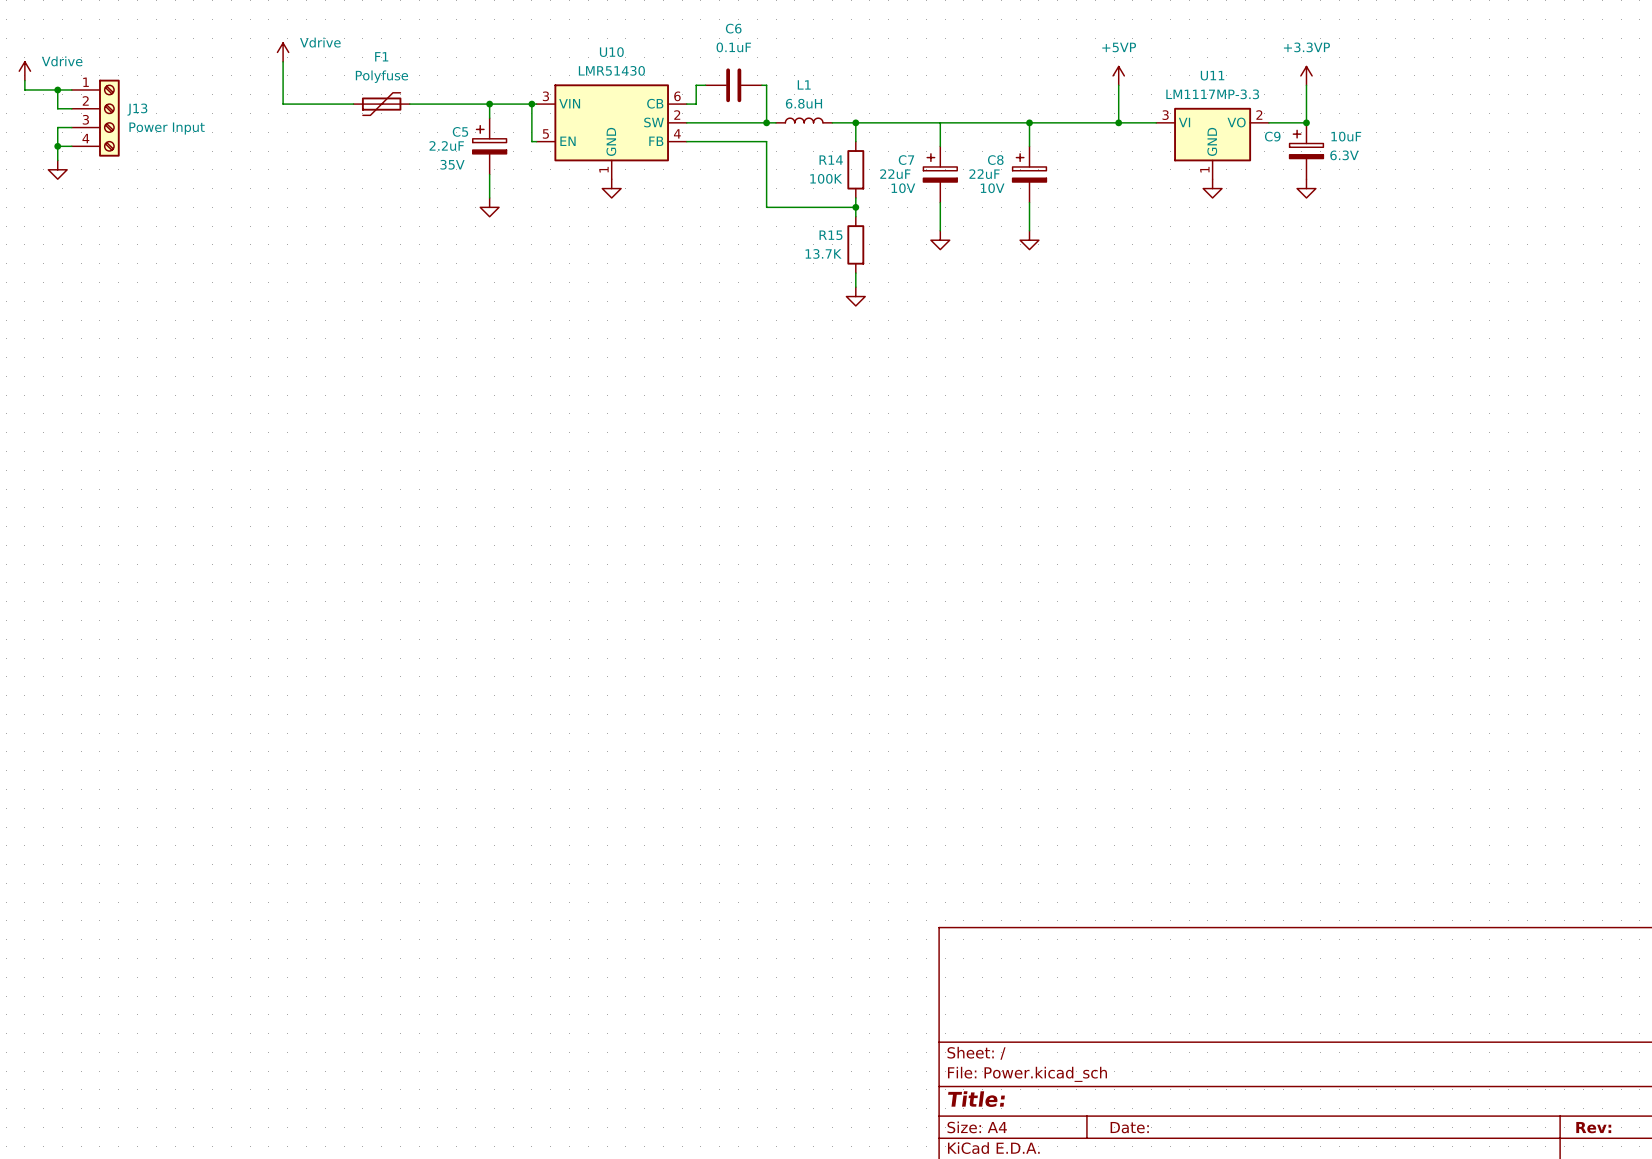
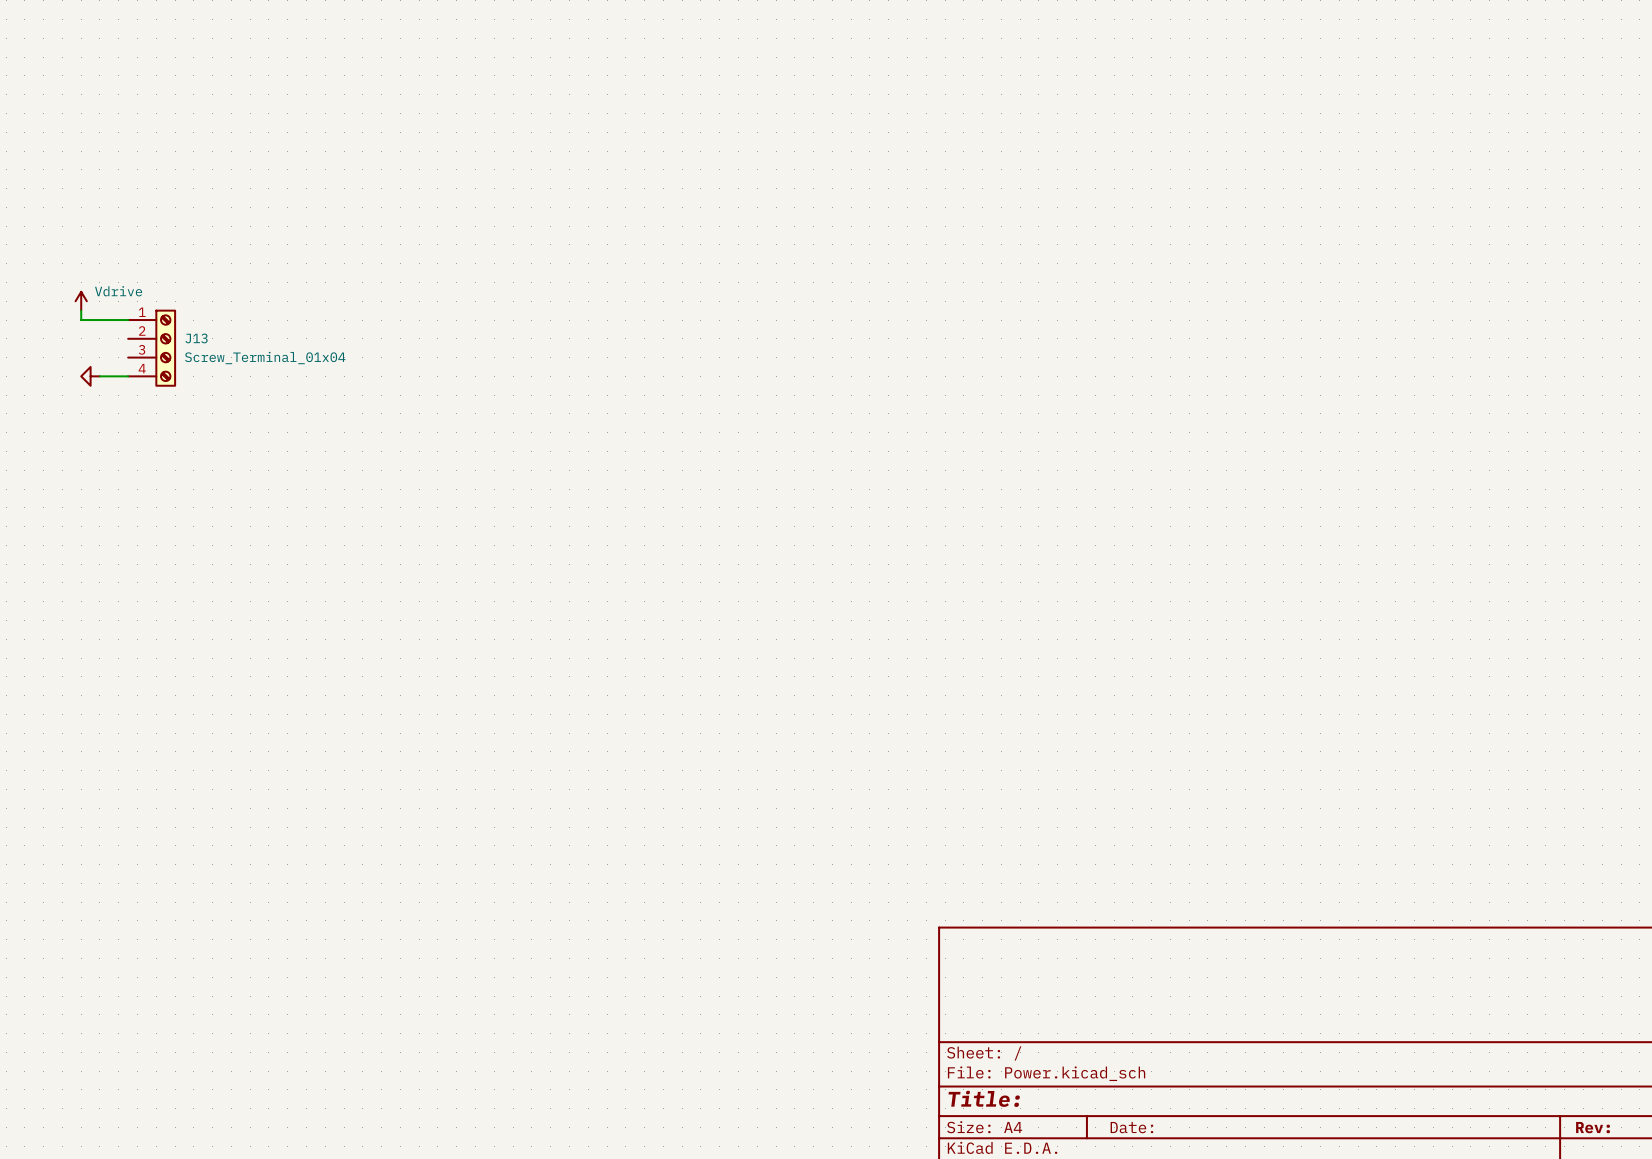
power symbol: Vdrive (283, 52) -> none
wire: (283, 61) (283, 104) (353, 104) -> none
power symbol: Vdrive (24, 71) -> none
power symbol: +5VP (1118, 75) -> none
power symbol: +3.3VP (1306, 75) -> none
wire: (24, 80) (24, 89) (71, 89) -> none
wire: (705, 85) (696, 85) (696, 104) (686, 104) -> none
C6: 0.1uF (733, 85) -> none
wire: (761, 85) (766, 85) (766, 122) -> none
wire: (1118, 85) (1118, 122) -> none
wire: (1306, 85) (1306, 122) (1268, 122) -> none
wire: (57, 89) (57, 108) (71, 108) -> none
junction: (57, 89) -> none
F1: Polyfuse (381, 104) -> none
wire: (409, 104) (536, 104) -> none
wire: (489, 104) (489, 118) -> none
junction: (489, 104) -> none
wire: (531, 104) (531, 141) (536, 141) -> none
junction: (531, 104) -> none
J13 position: (95, 118) -> (152, 348)
L1: 6.8uH (804, 120) -> none
wire: (686, 122) (776, 122) -> none
junction: (766, 122) -> none
wire: (832, 122) (1156, 122) -> none
wire: (855, 122) (855, 141) -> none
junction: (855, 122) -> none
wire: (940, 122) (940, 146) -> none
wire: (1029, 122) (1029, 146) -> none
junction: (1029, 122) -> none
junction: (1118, 122) -> none
junction: (1306, 122) -> none
wire: (71, 127) (57, 127) (57, 160) -> none
J13 value: Power Input (167, 128) -> Screw_Terminal_01x04 (265, 358)
U10: LMR51430 (611, 131) -> none
wire: (686, 141) (766, 141) (766, 207) (855, 207) -> none
U11: LM1117MP-3.3 (1212, 143) -> none
wire: (57, 146) (71, 146) -> none
junction: (57, 146) -> none
C5: 2.2uF (489, 146) -> none
C9: 10uF (1306, 151) -> none
power symbol: (57, 169) -> none
R14: 100K (855, 169) -> none
wire: (489, 174) (489, 197) -> none
C7: 22uF (940, 174) -> none
C8: 22uF (1029, 174) -> none
power symbol: (611, 188) -> none
power symbol: (1212, 188) -> none
power symbol: (1306, 188) -> none
wire: (855, 197) (855, 216) -> none
wire: (940, 202) (940, 230) -> none
wire: (1029, 202) (1029, 230) -> none
power symbol: (489, 207) -> none
junction: (855, 207) -> none
power symbol: (940, 240) -> none
power symbol: (1029, 240) -> none
R15: 13.7K (855, 244) -> none
wire: (855, 273) (855, 287) -> none
power symbol: (855, 296) -> none
power symbol: none -> Vdrive (81, 301)
wire: none -> (81, 310) (81, 320) (128, 320)
power symbol: none -> (90, 376)
wire: none -> (99, 376) (128, 376)

